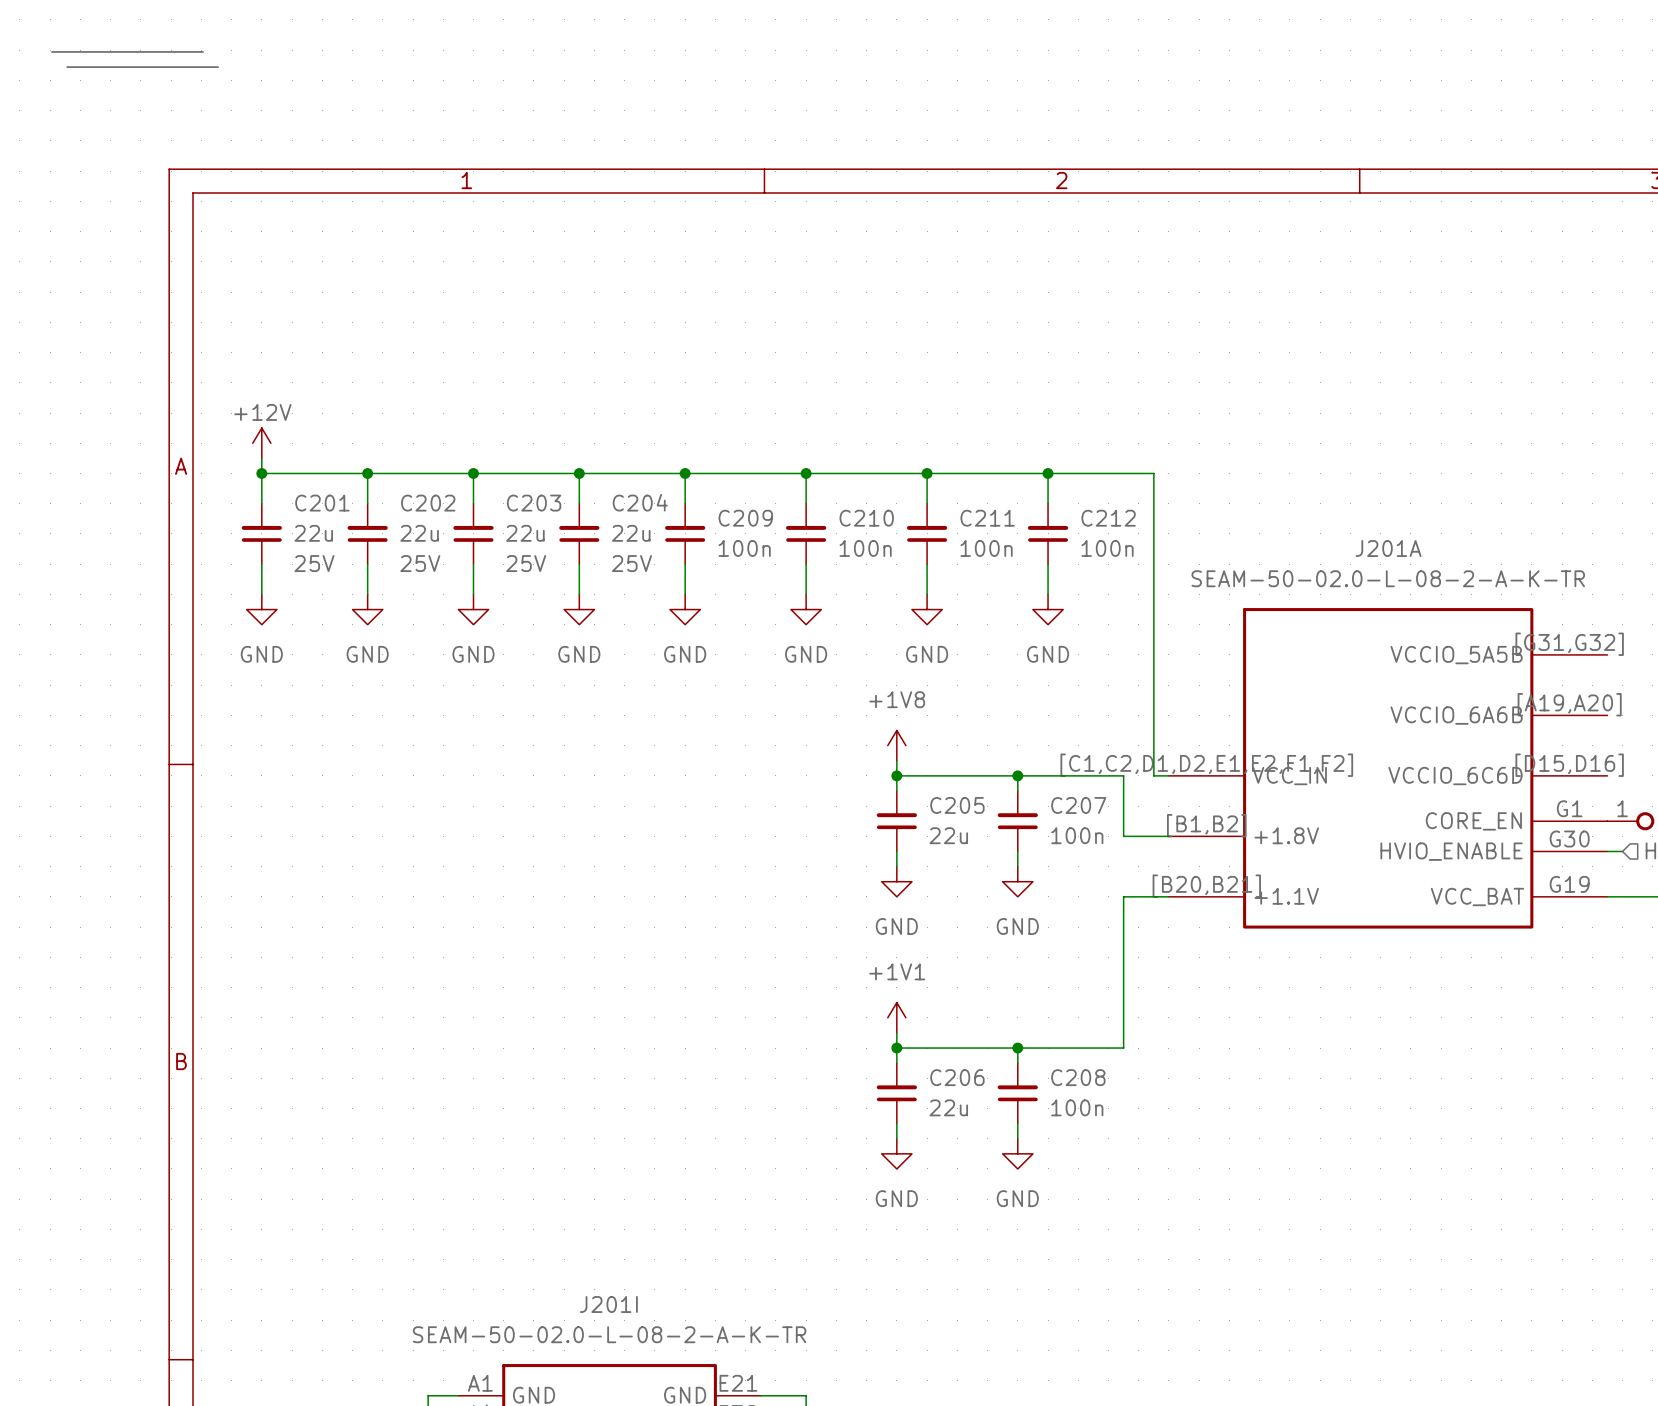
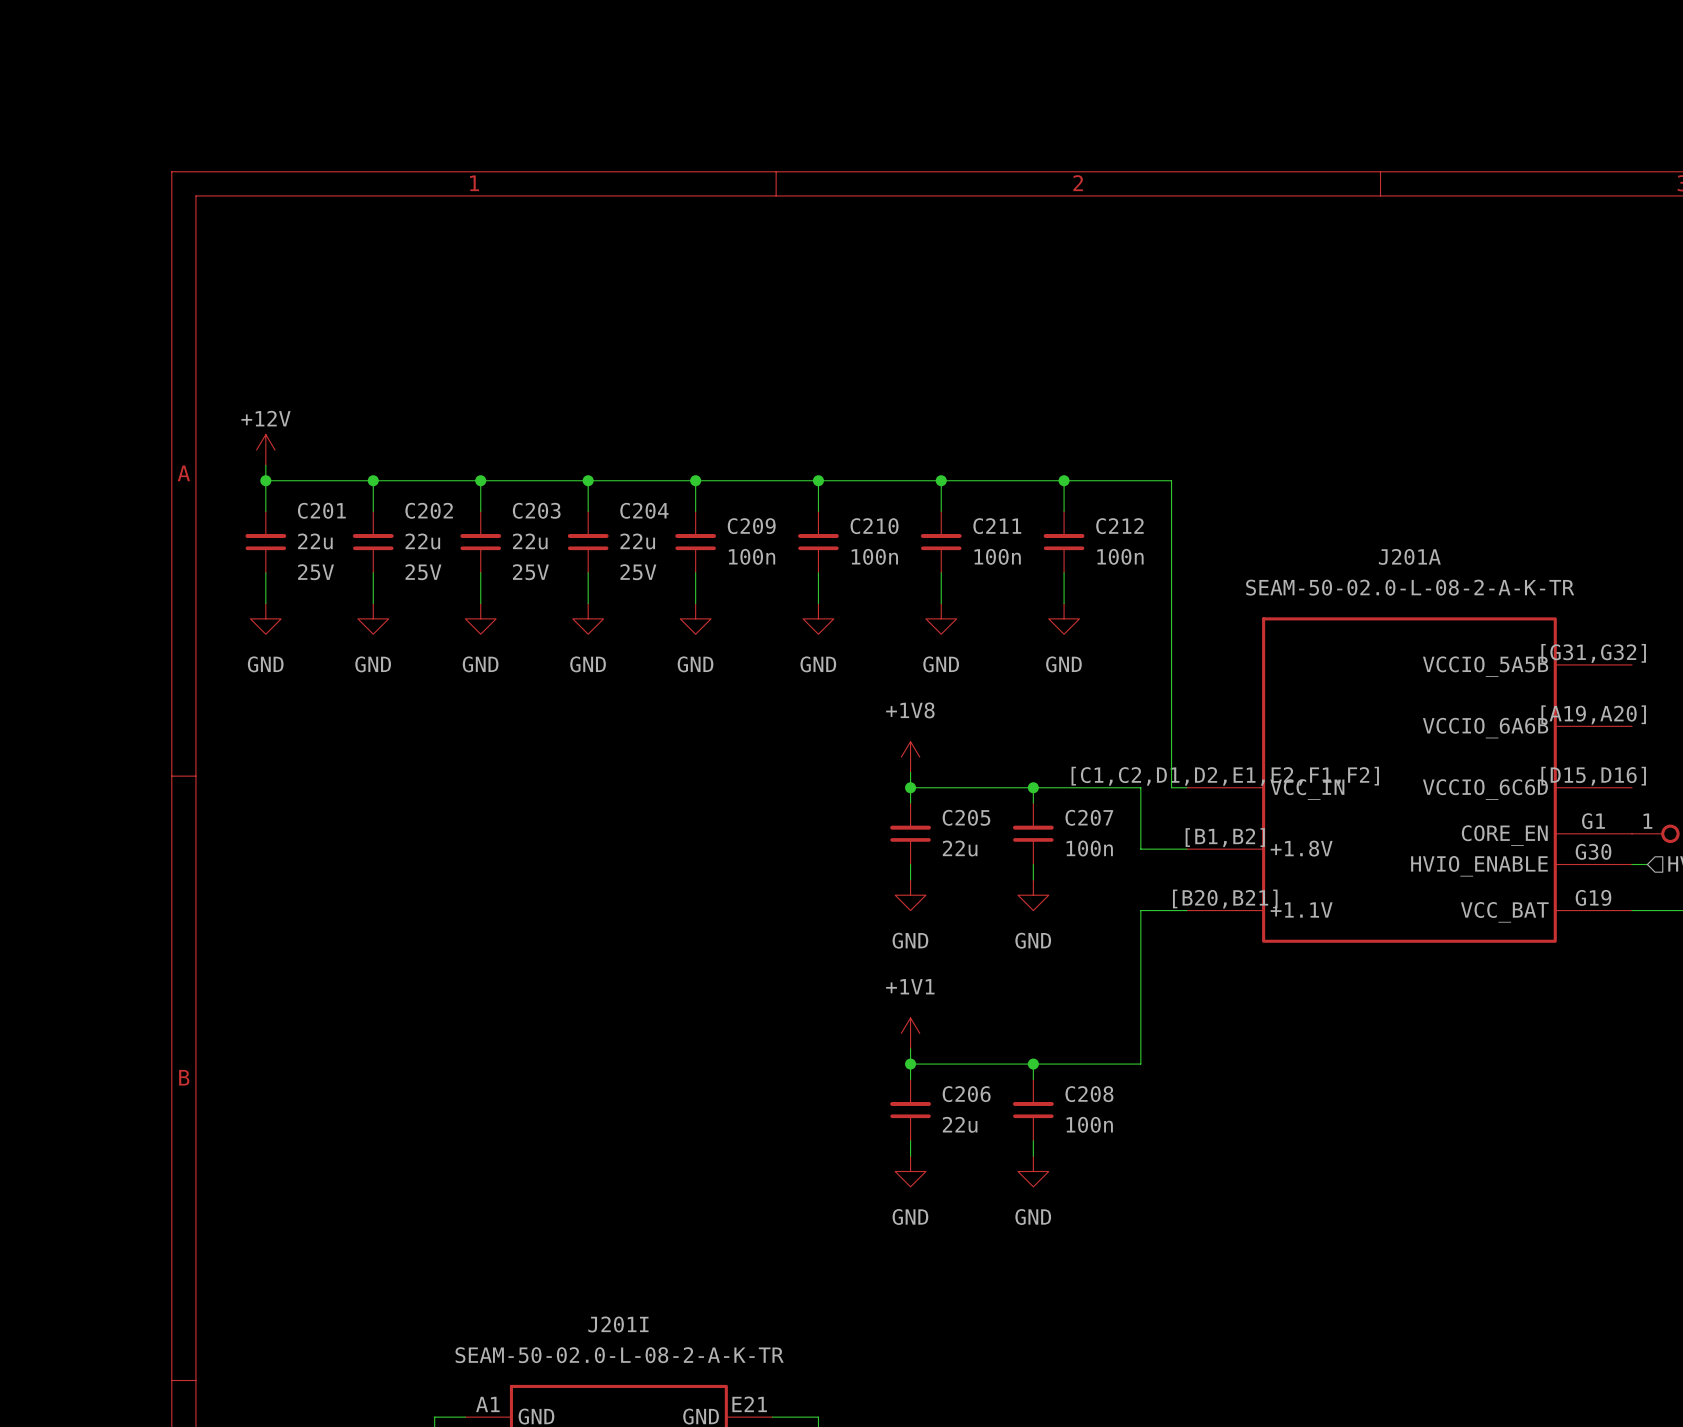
bus: (51, 51) (203, 51) -> none
bus: (67, 67) (218, 67) -> none

